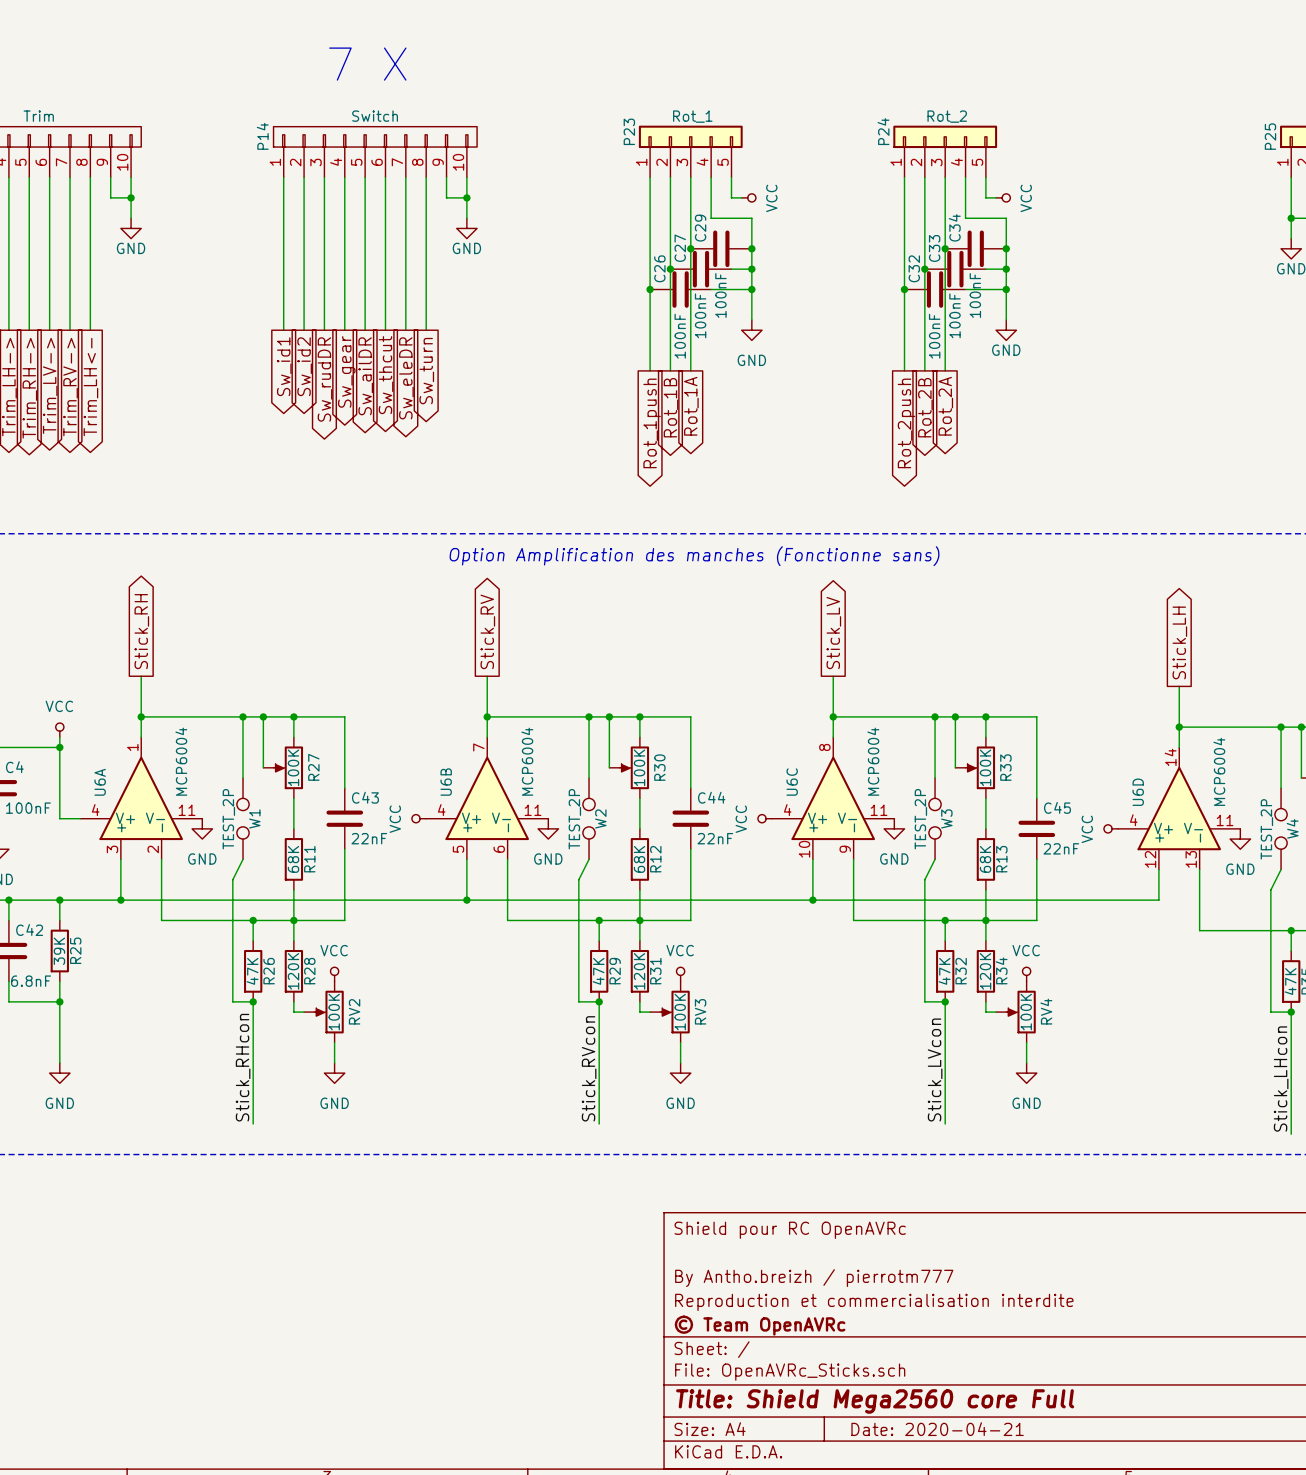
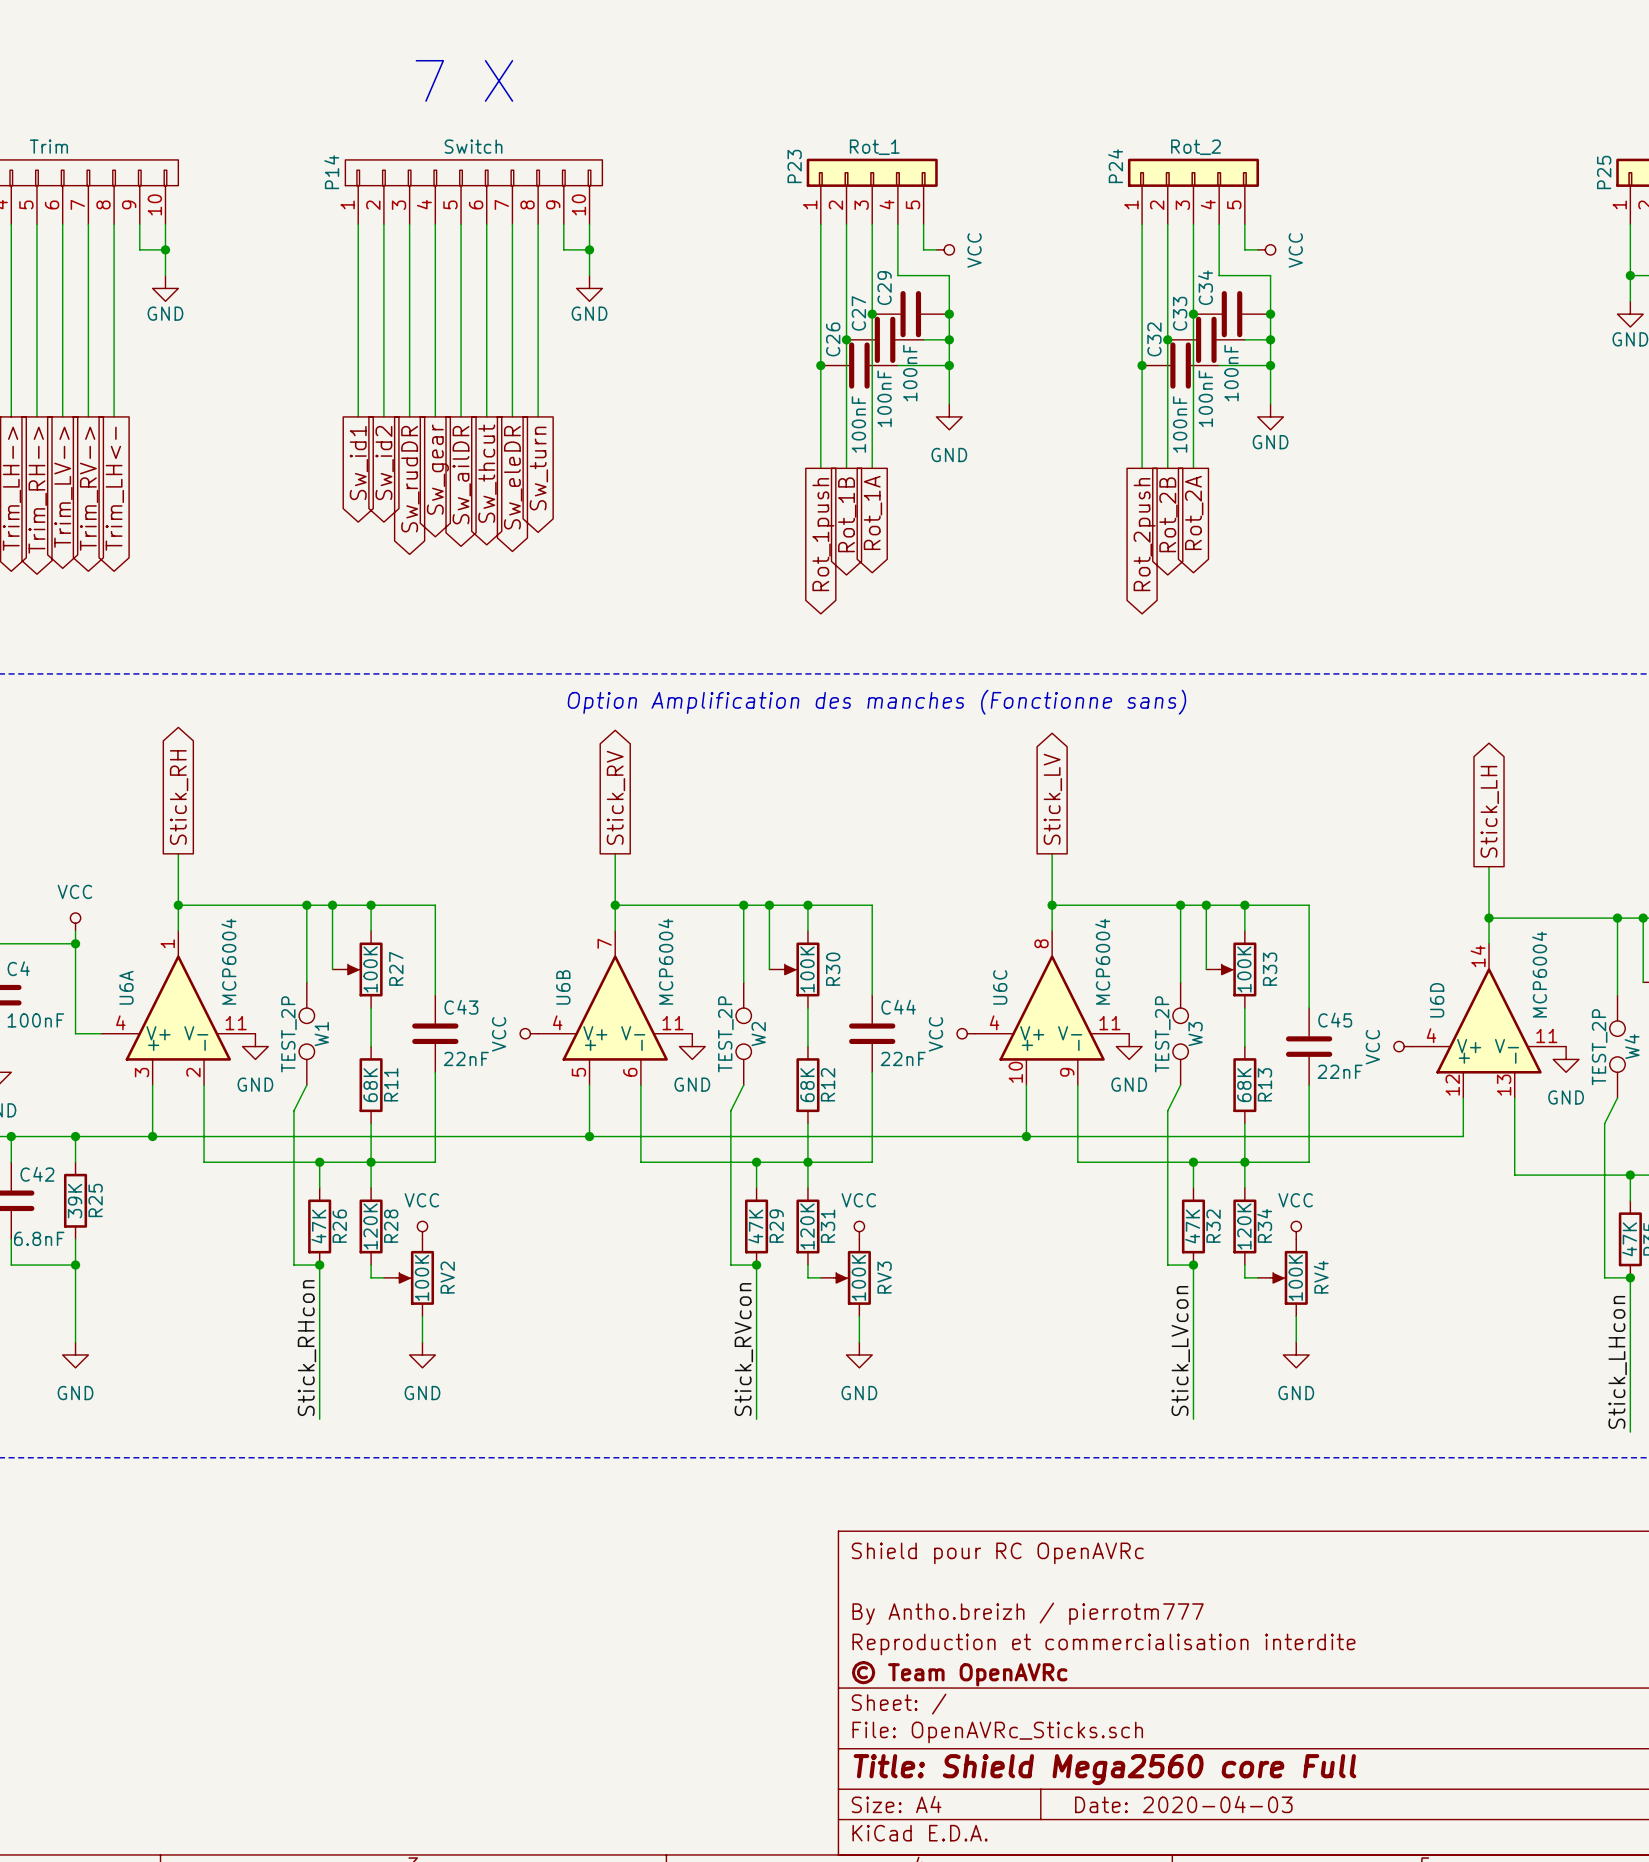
title block: Date: 2020-04-21 (937, 1429) -> Date: 2020-04-03 (1183, 1804)

